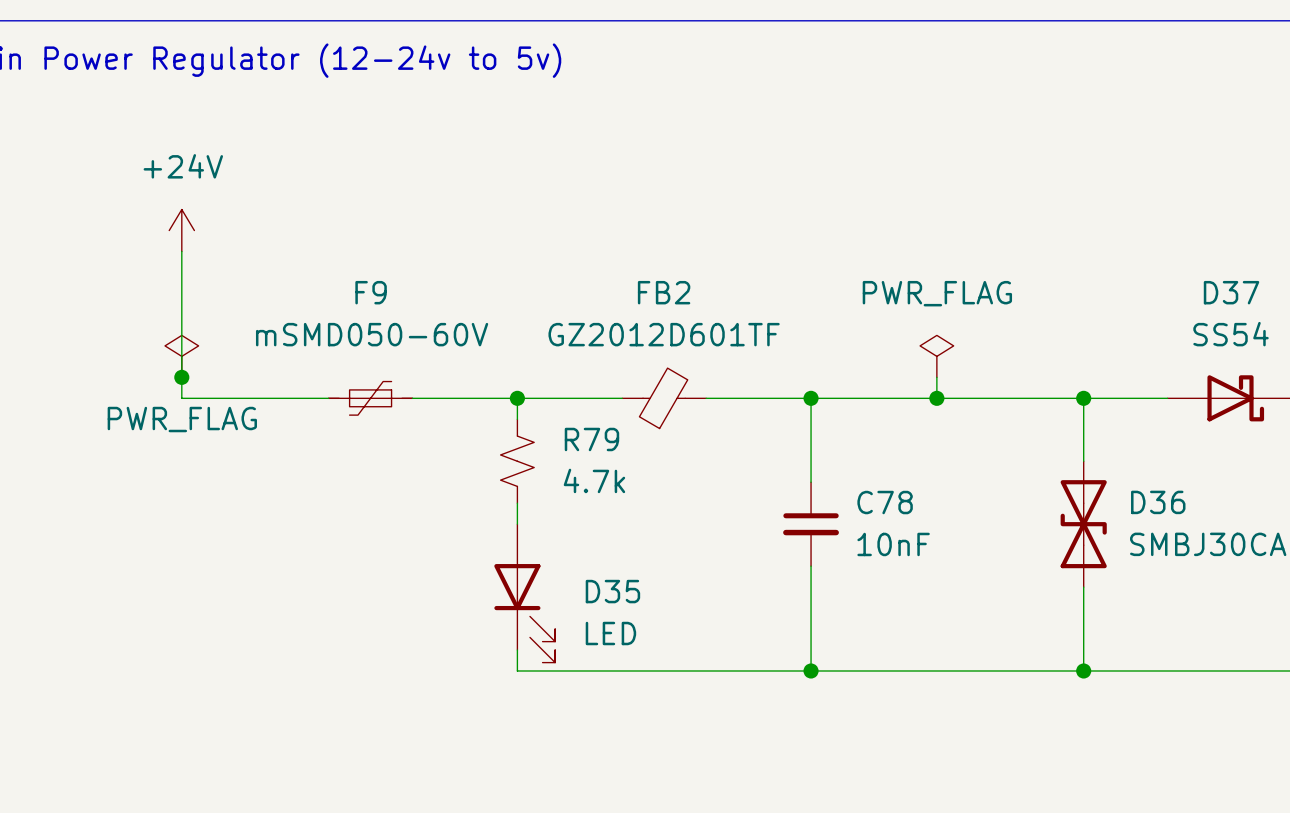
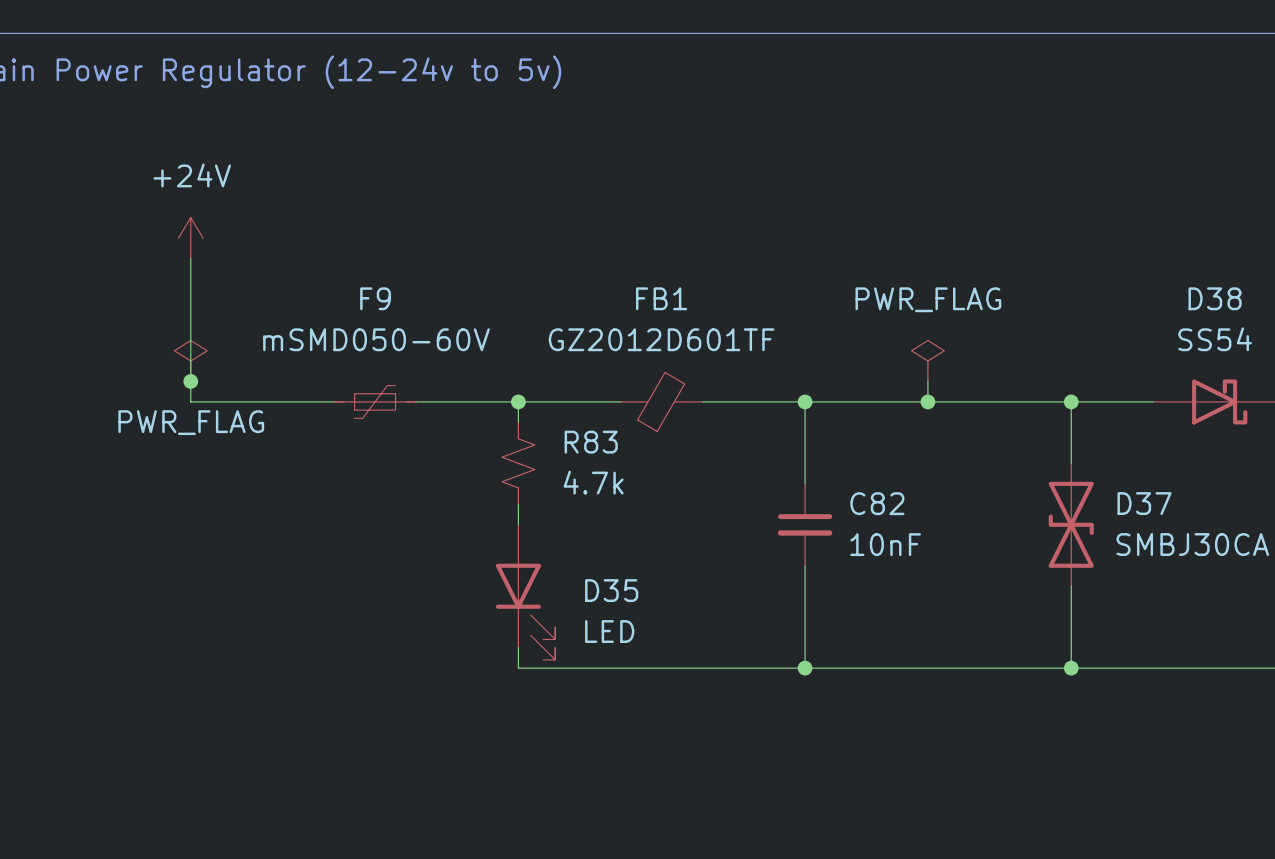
FB2 name: FB2 (664, 292) -> FB1 (661, 298)
D37 name: D37 (1231, 292) -> D38 (1215, 298)
R79 name: R79 (591, 439) -> R83 (591, 442)
C78 name: C78 (885, 502) -> C82 (877, 503)
D36 name: D36 (1158, 502) -> D37 (1144, 503)

